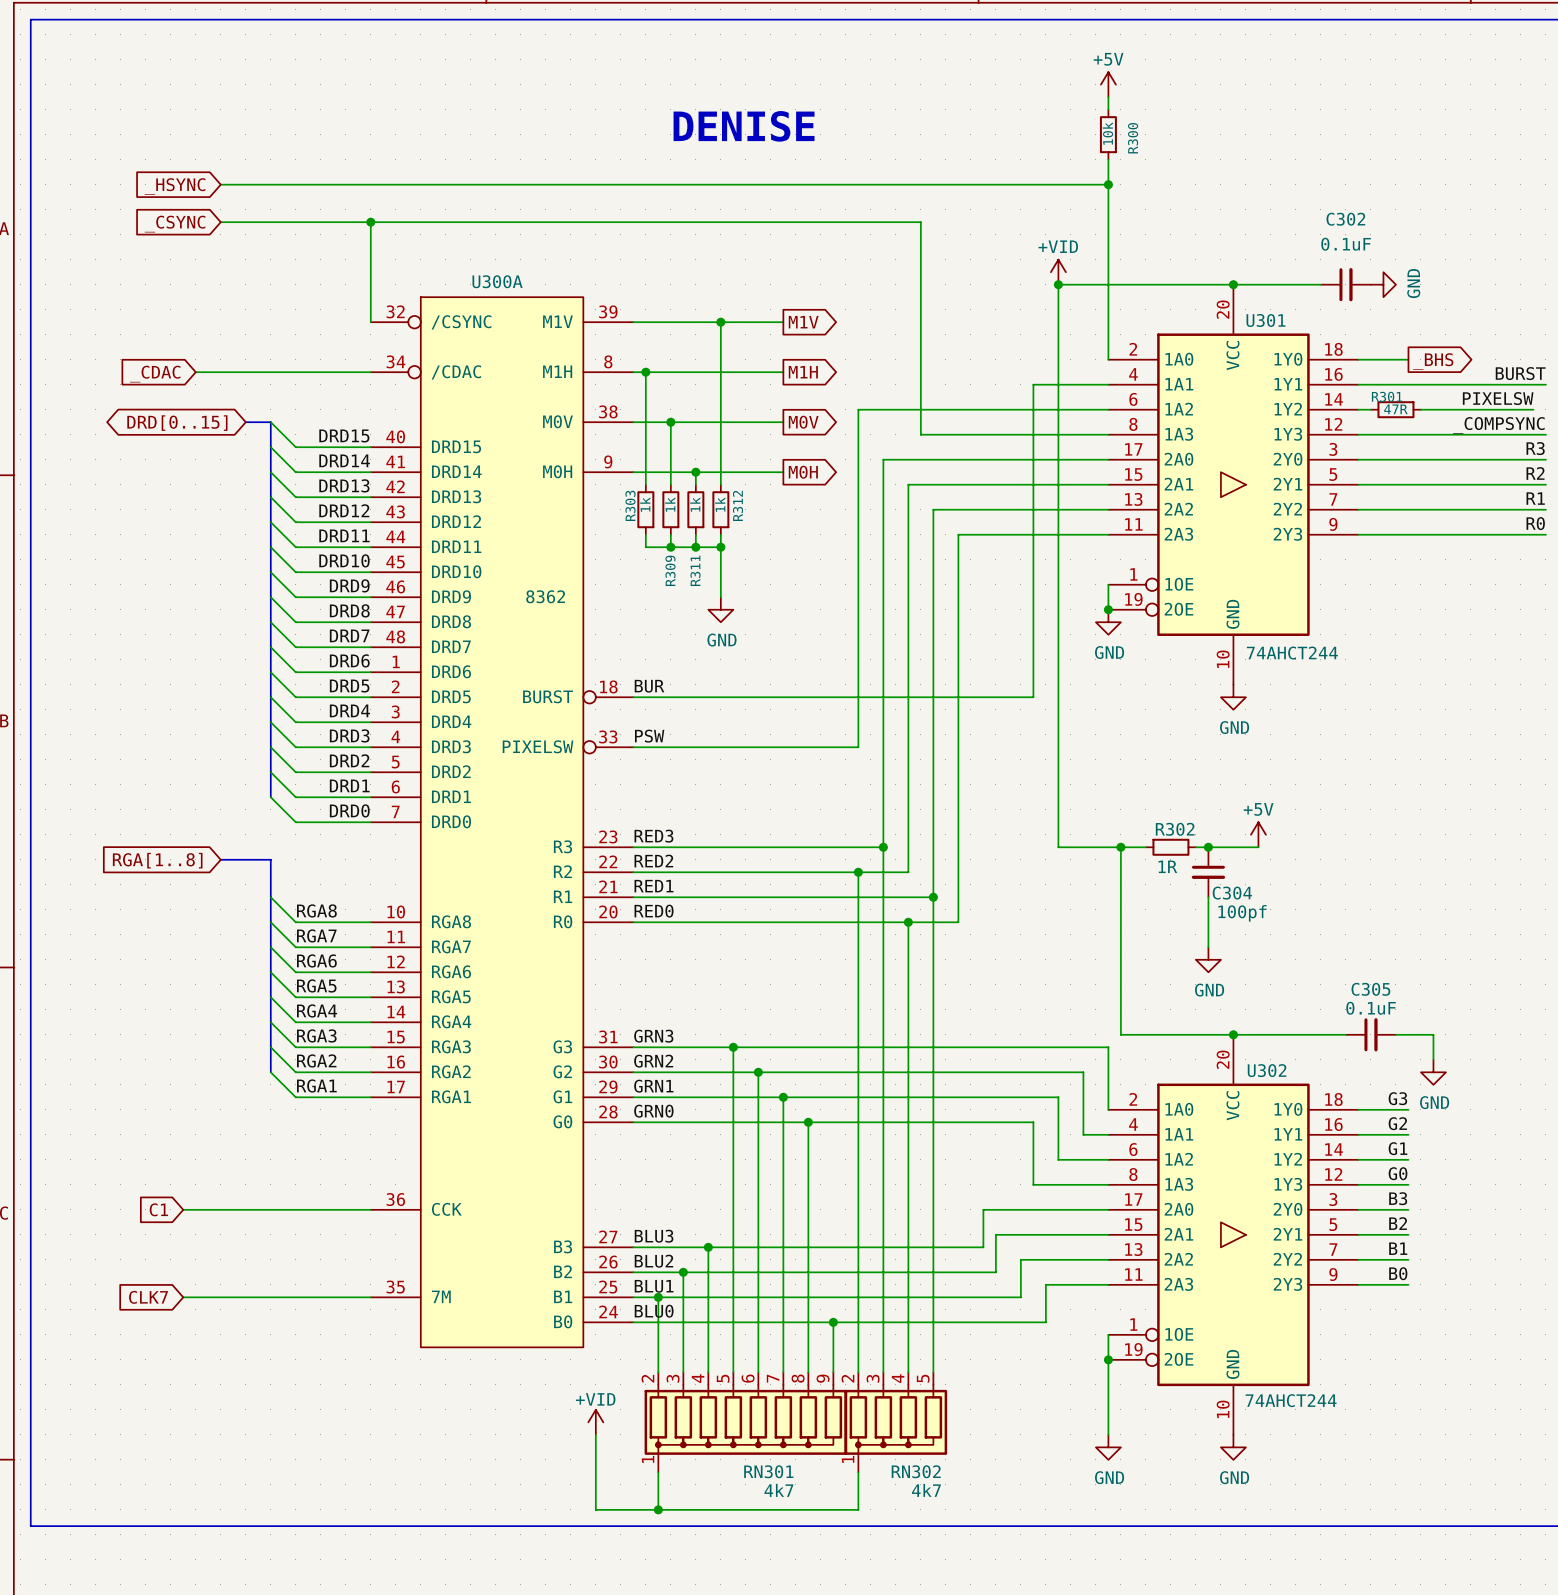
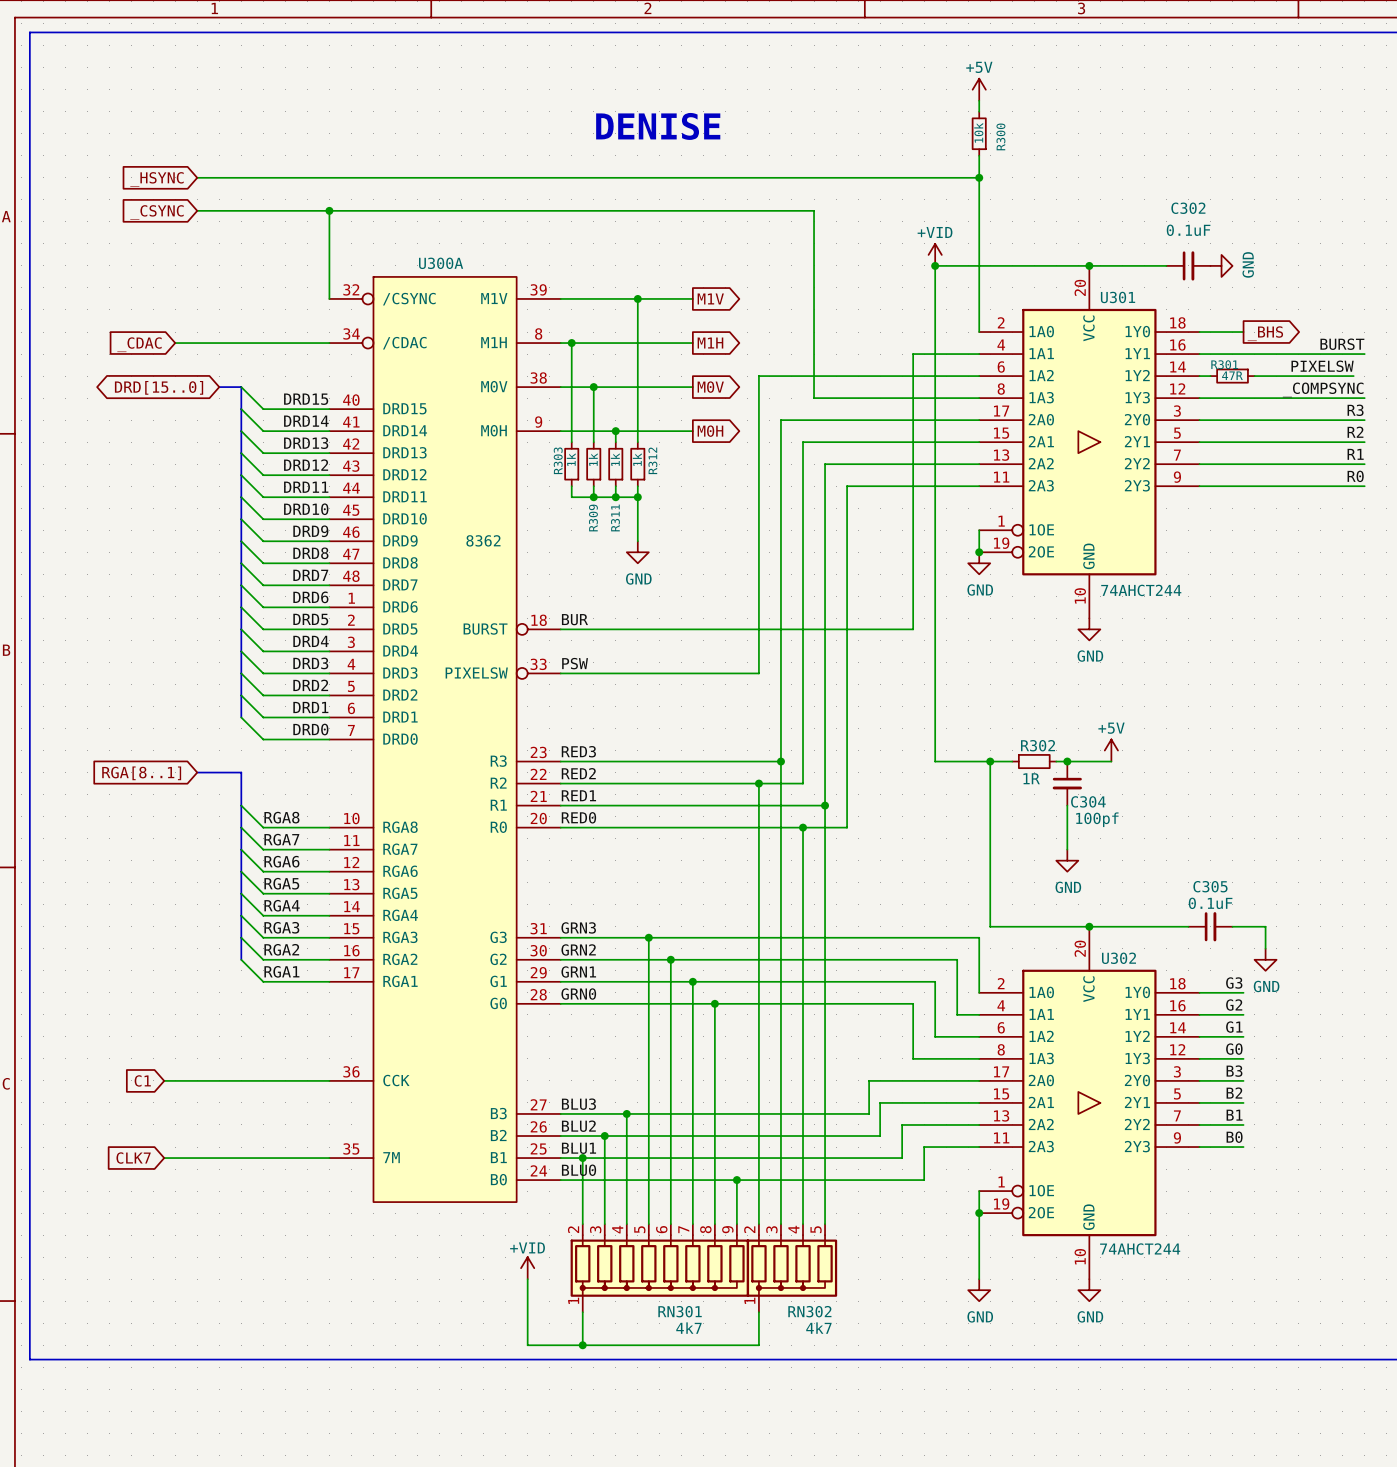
global label: DRD[0..15] (177, 423) -> DRD[15..0] (159, 387)
global label: RGA[1..8] (157, 860) -> RGA[8..1] (141, 773)

